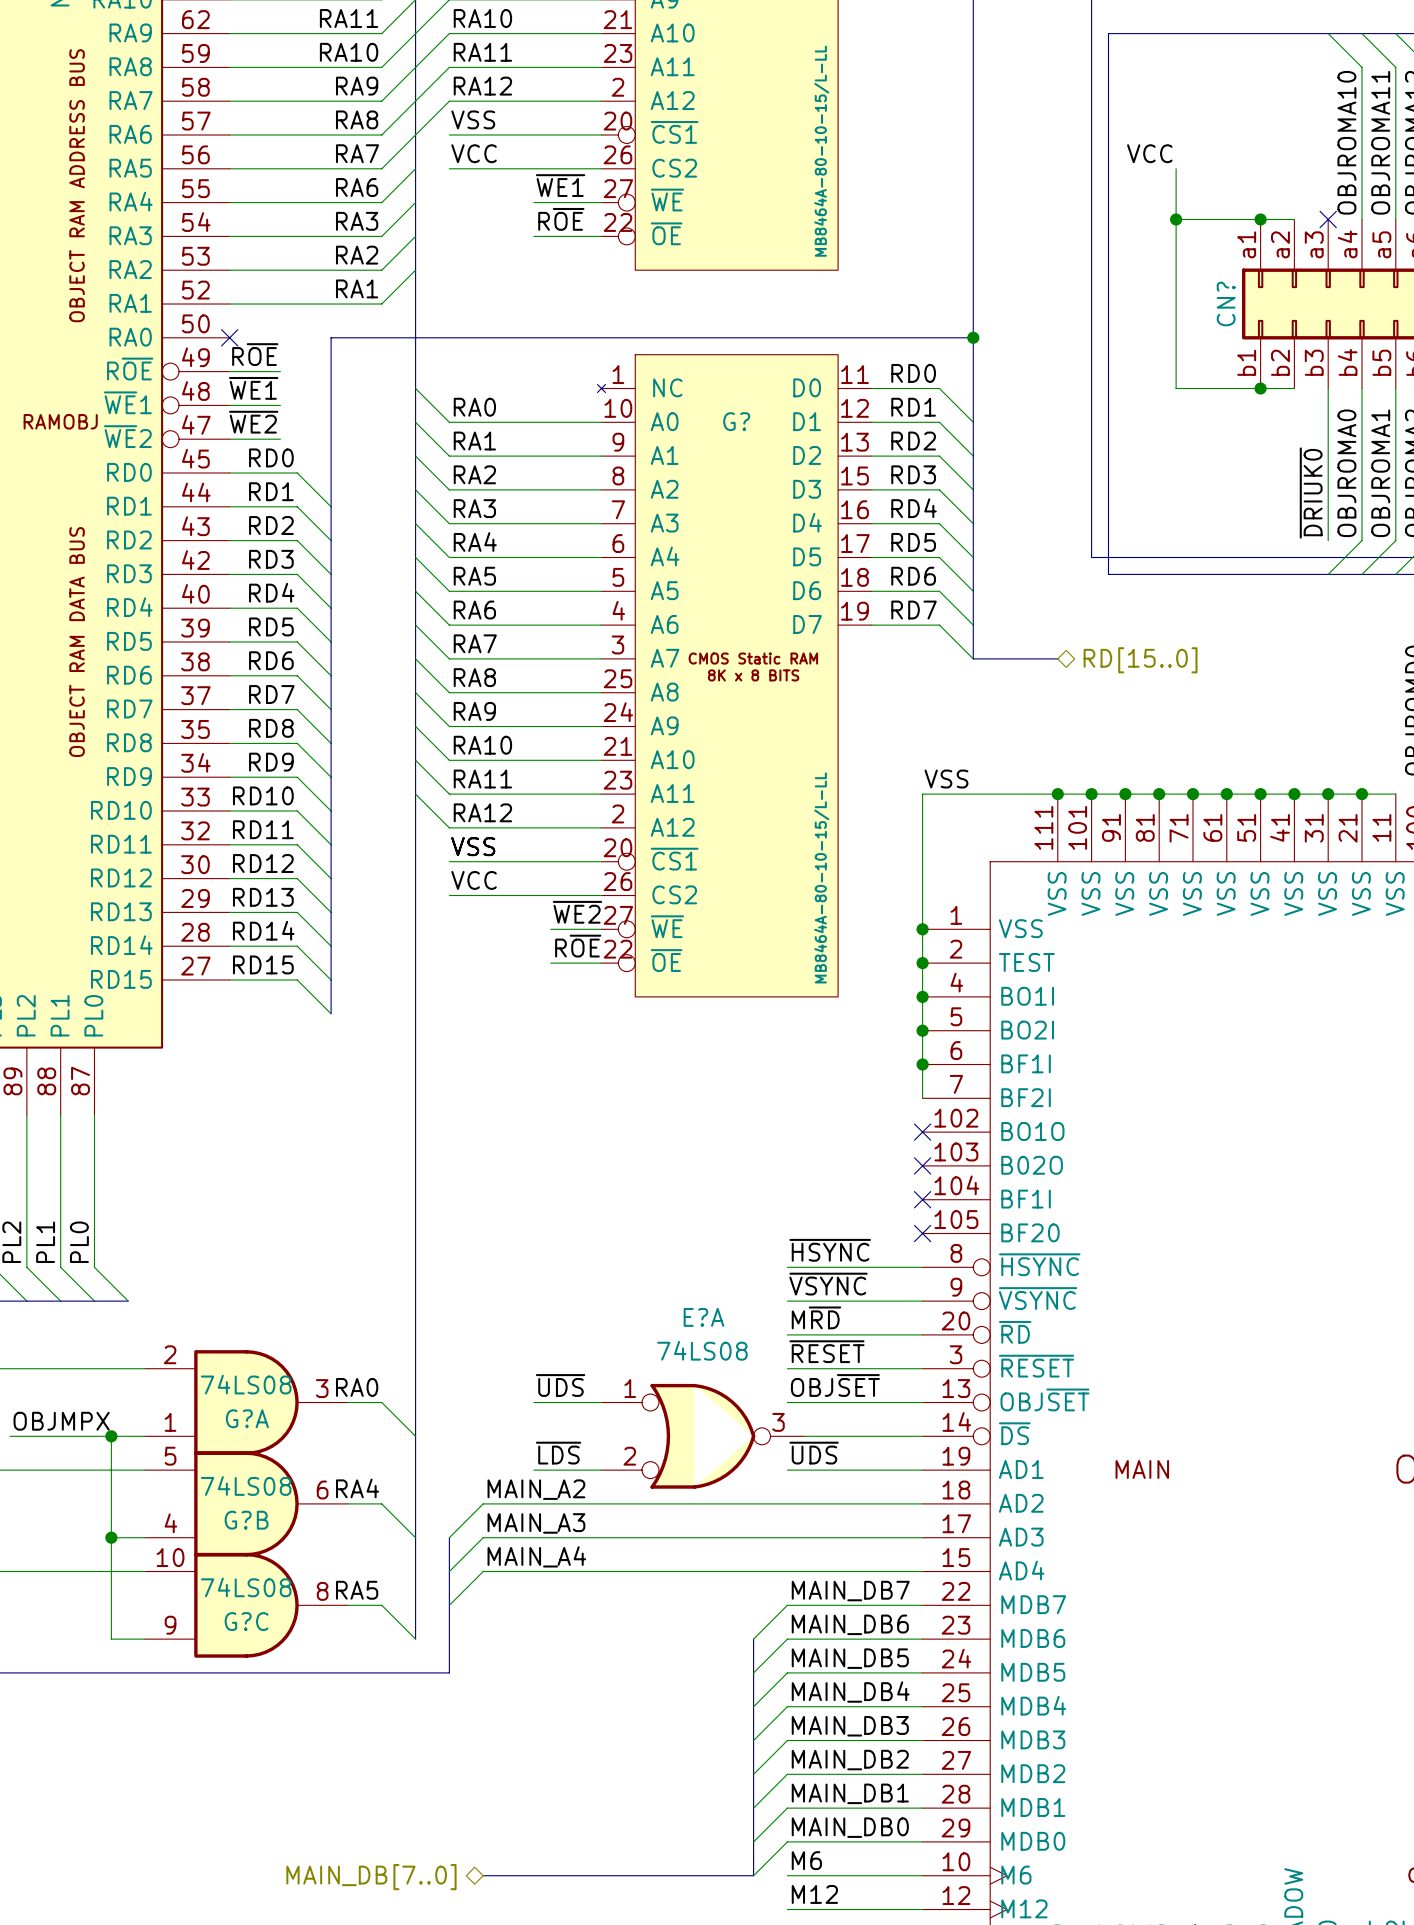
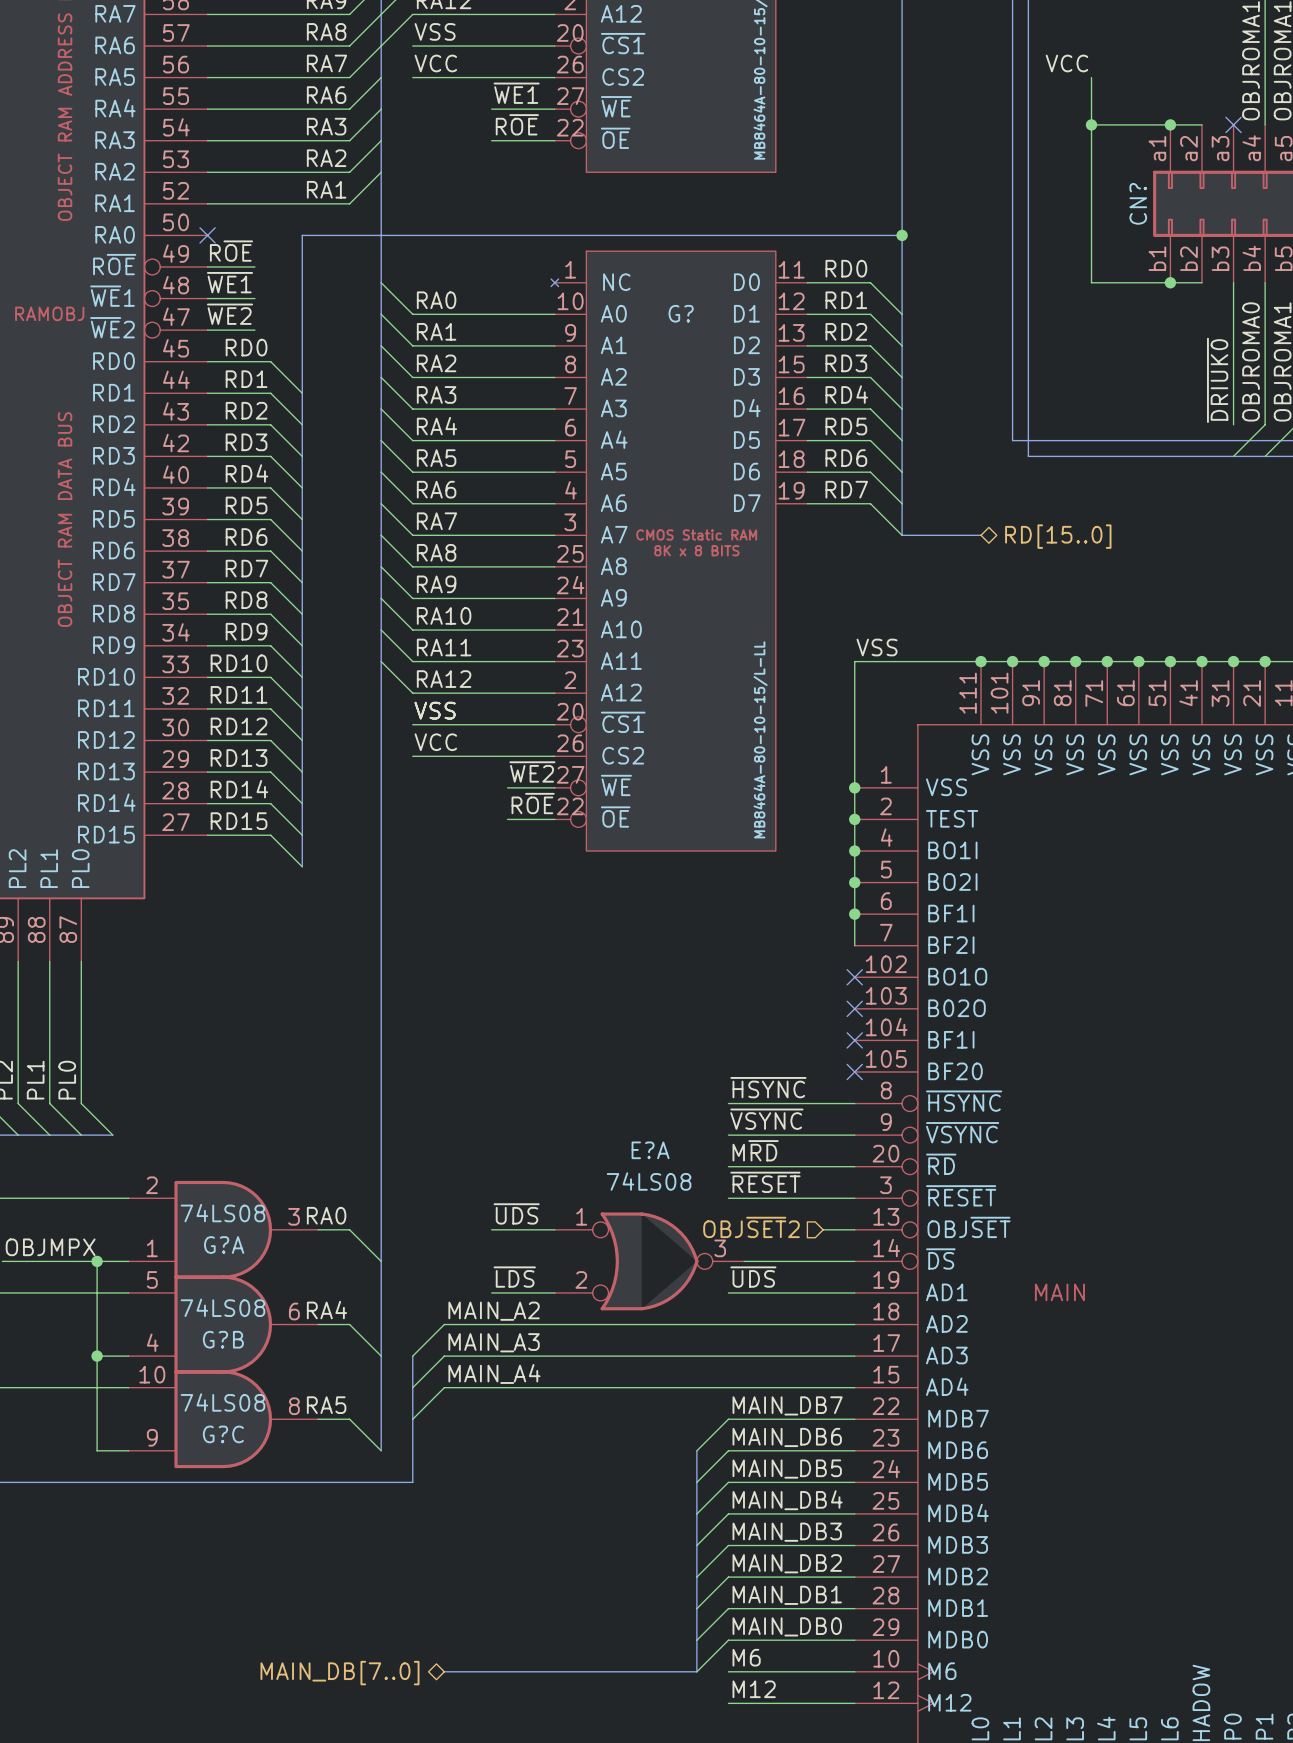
label: OBJ~{SET} (835, 1385) -> none
hierarchical label: none -> OBJ~{SET}2 (751, 1227)
wire: (787, 1402) (888, 1402) -> none

